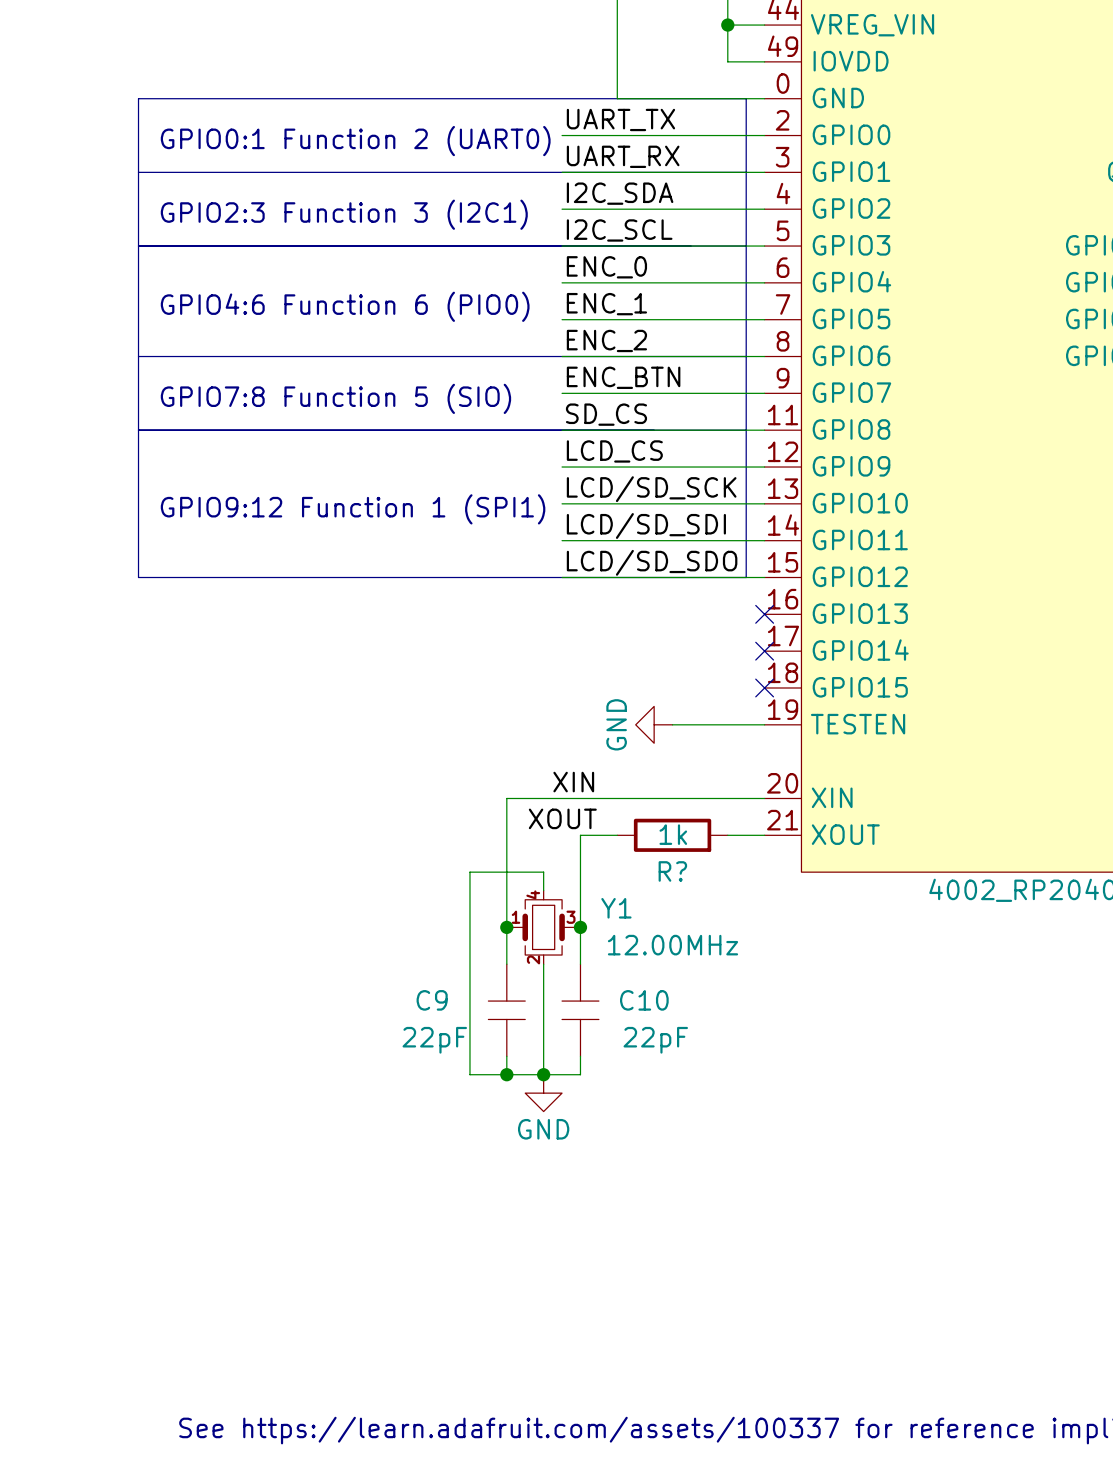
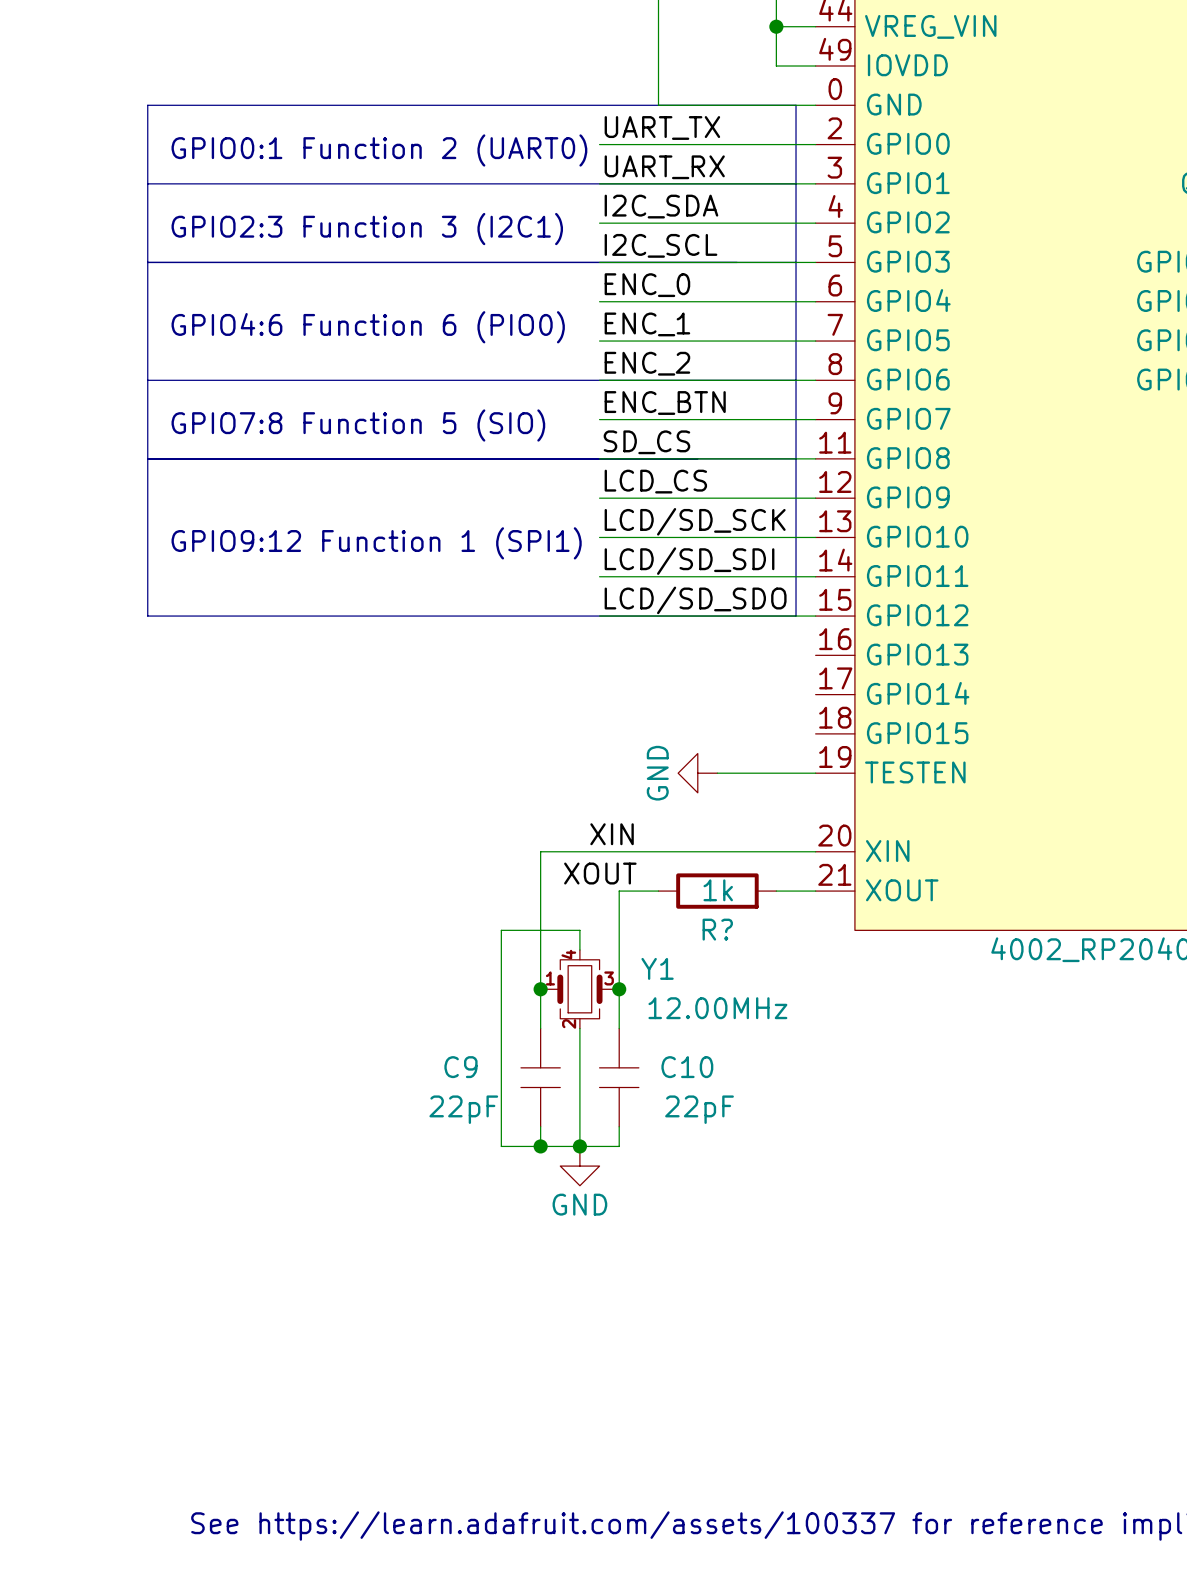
no-connect mark: (764, 614) -> none
no-connect mark: (764, 651) -> none
no-connect mark: (764, 687) -> none

